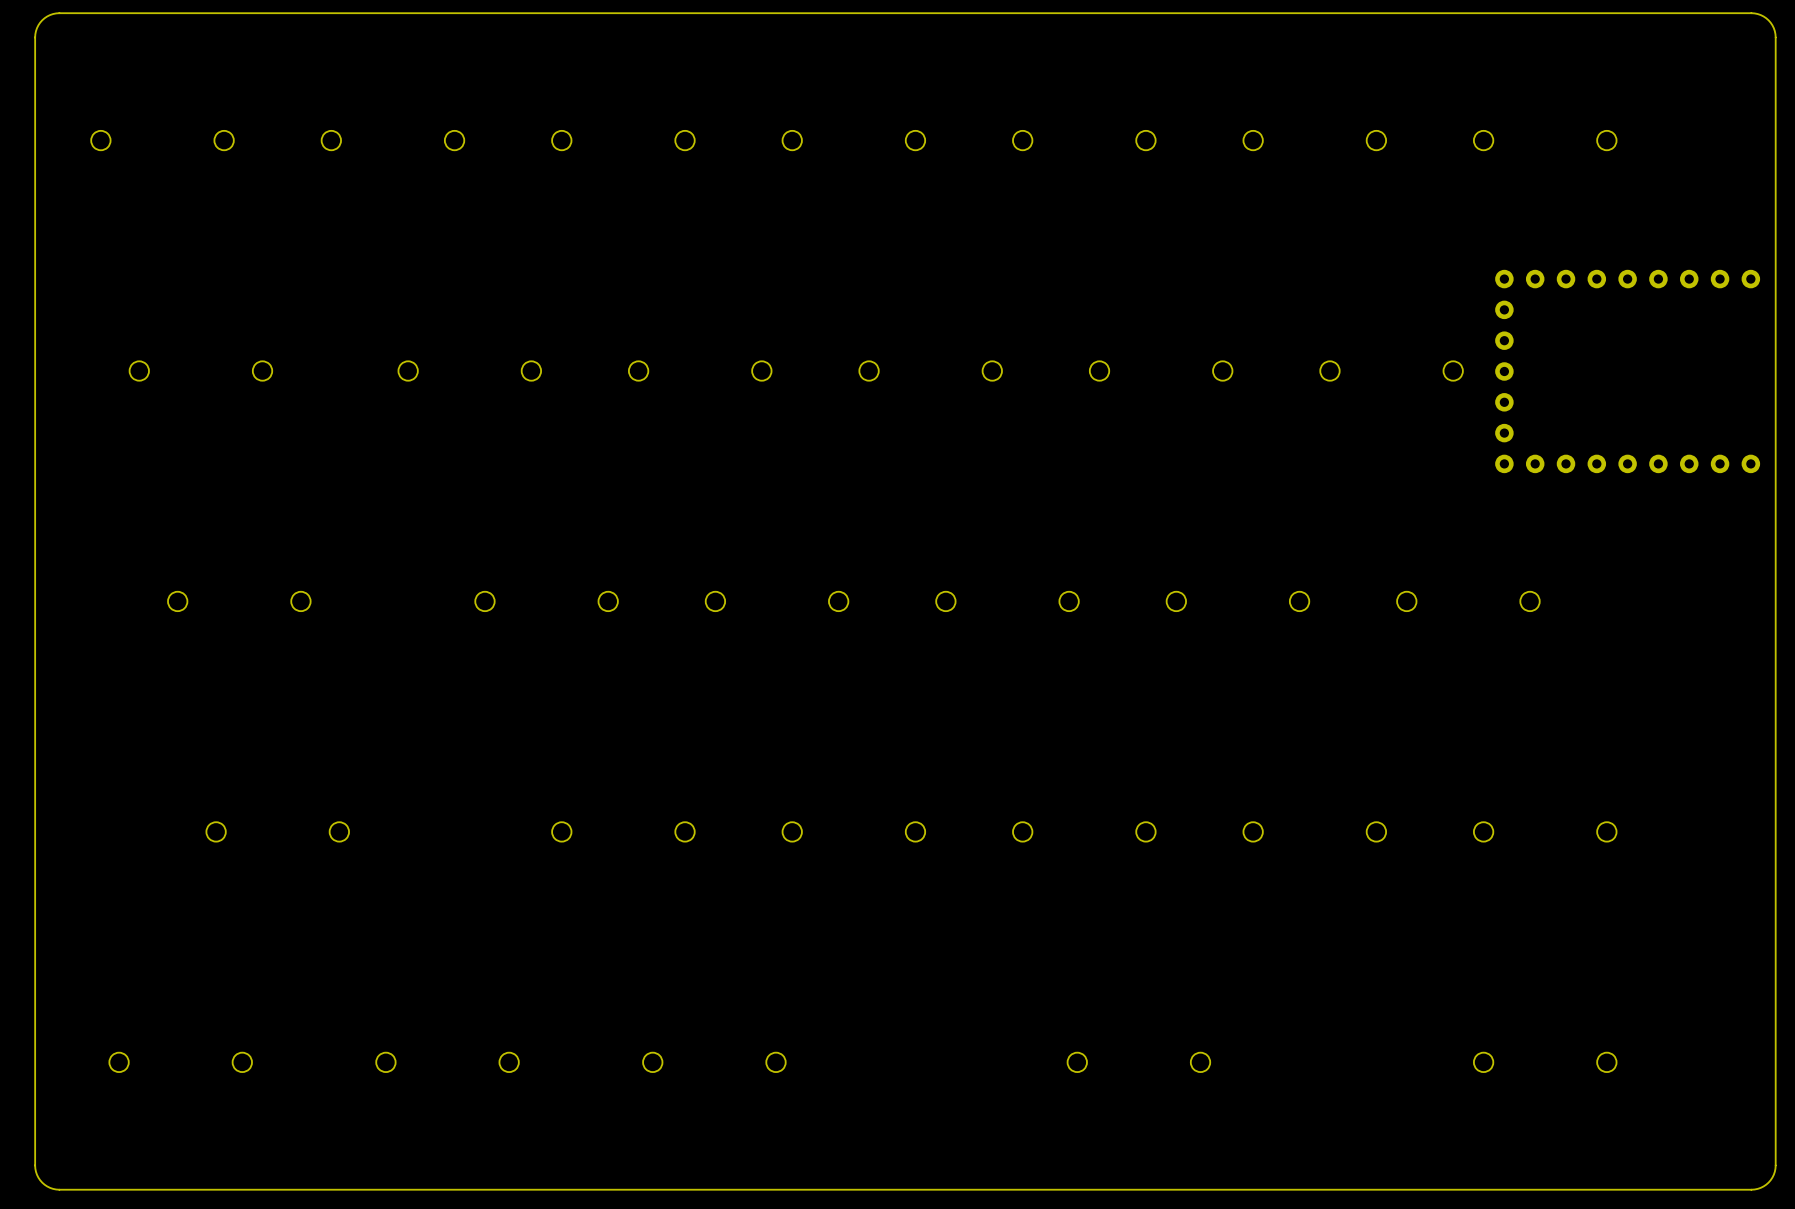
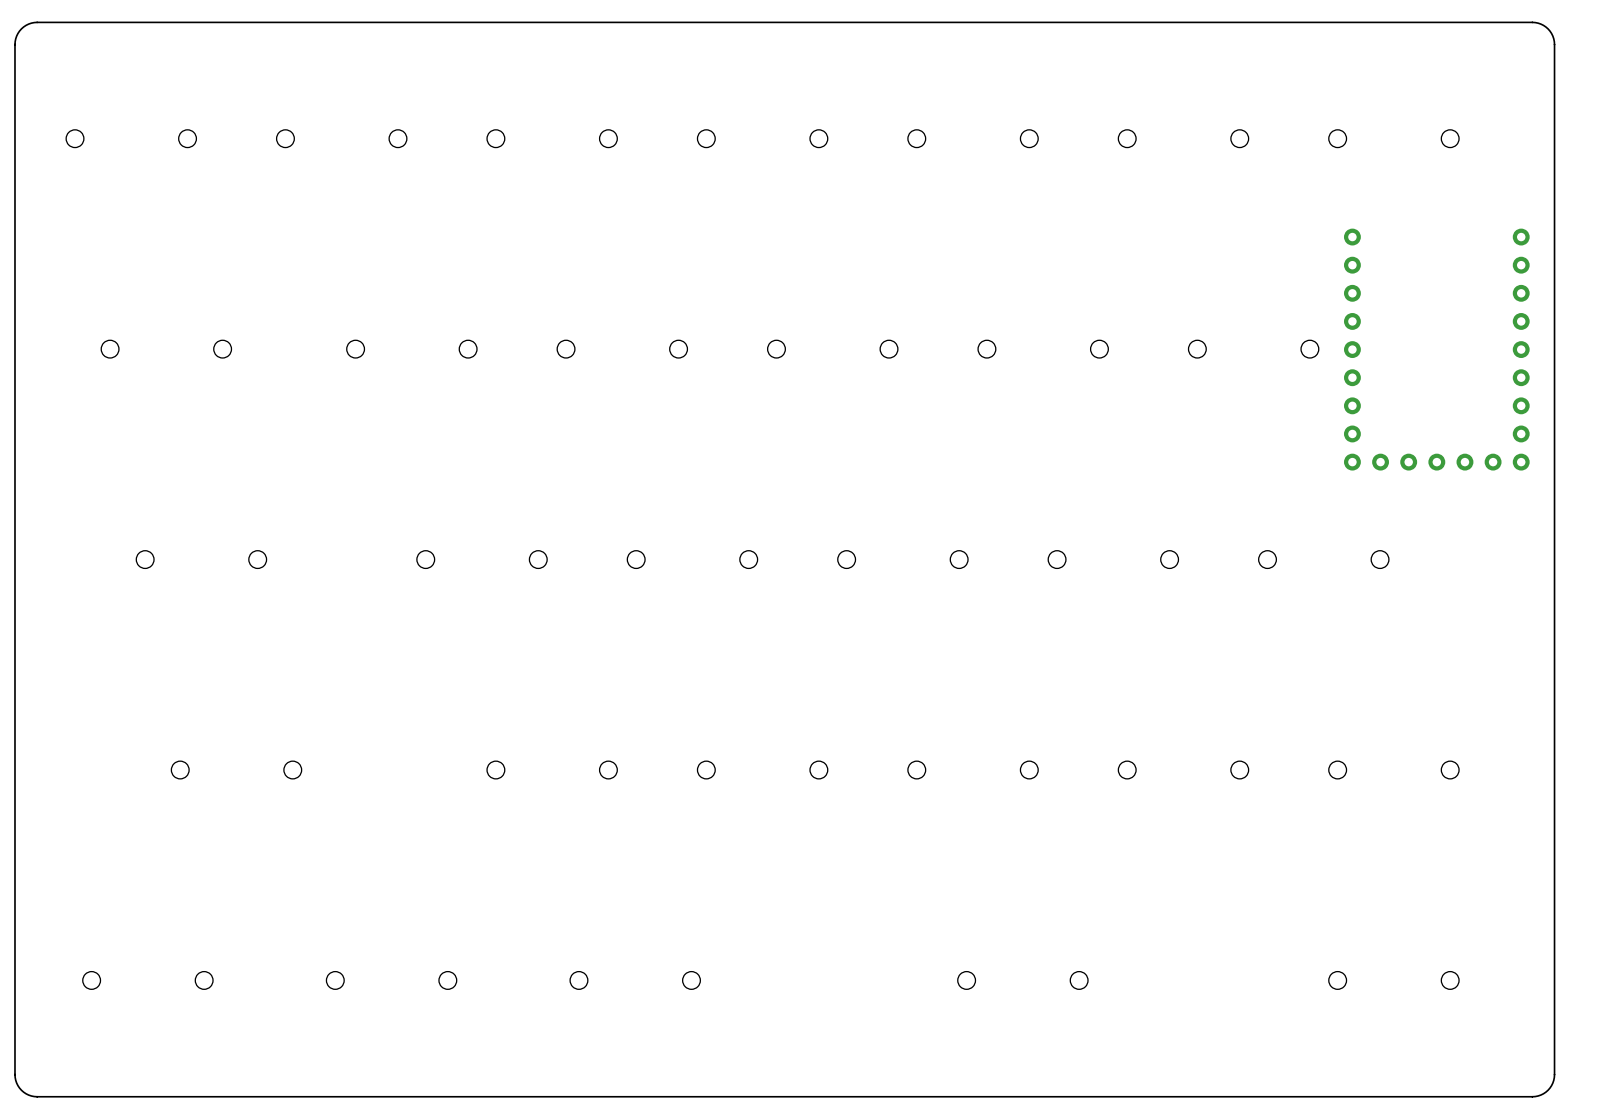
board edge: (1696, 13) (1757, 14) (1770, 22) (1775, 37) (1775, 1168) (1770, 1180) (1757, 1188) (1696, 1189) -> (1532, 22) (1540, 24) (1548, 28) (1552, 36) (1554, 44) (1554, 1074) (1552, 1083) (1548, 1090) (1540, 1095) (1532, 1096)
part rotation: 0° (1627, 371) -> 90° counterclockwise (1436, 349)

